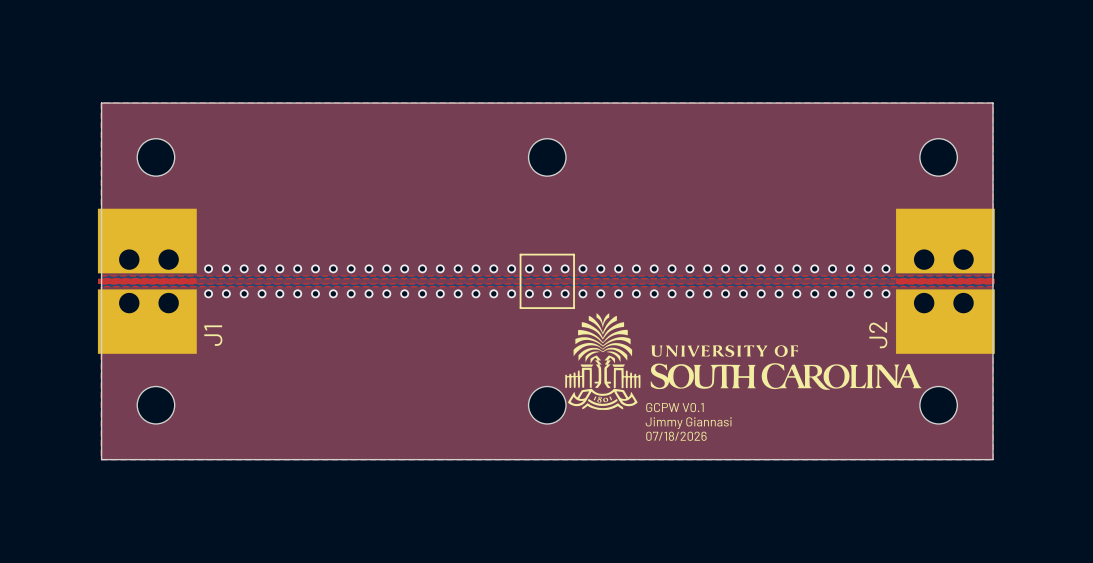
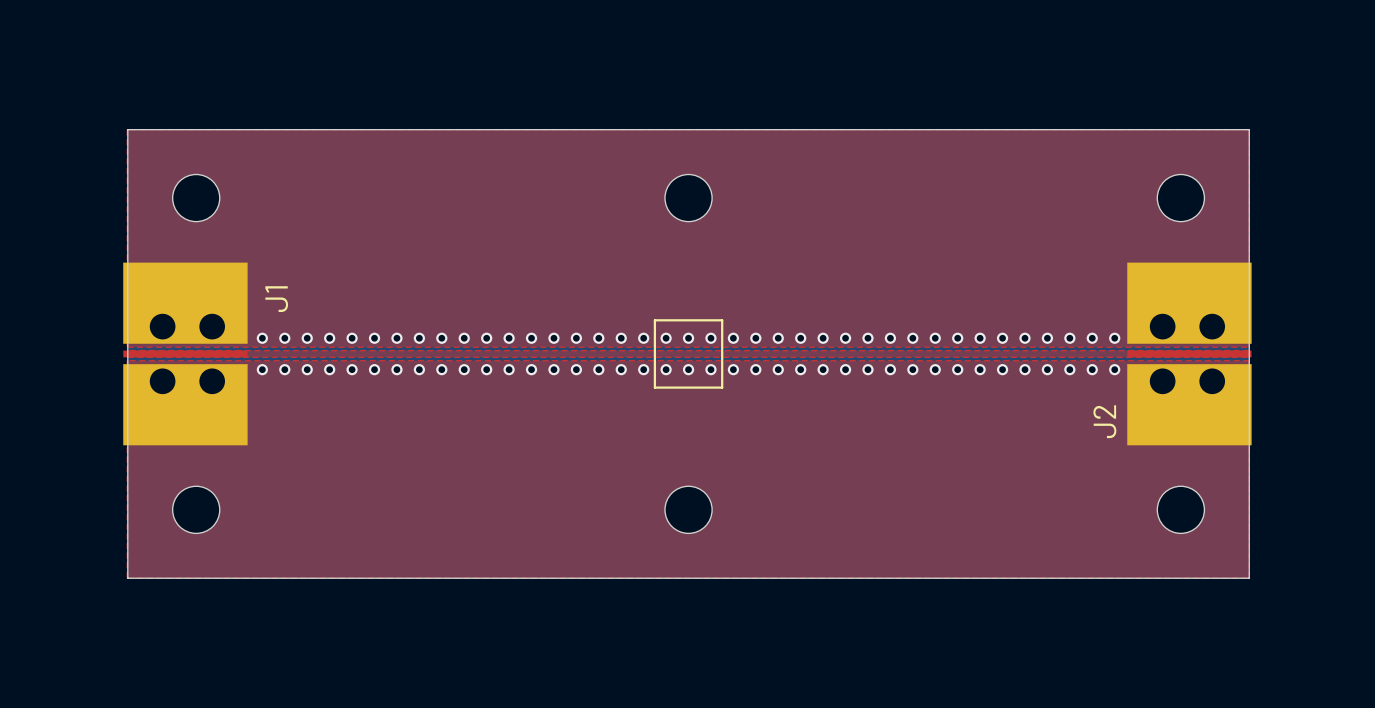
drawing: [565, 313, 922, 410] -> none
J1 name position: J1 (213, 335) -> J1 (276, 299)
text: GCPW V0.1 (674, 407) -> none
text: Jimmy Giannasi (688, 423) -> none
text: 07/18/2026 (676, 436) -> none

